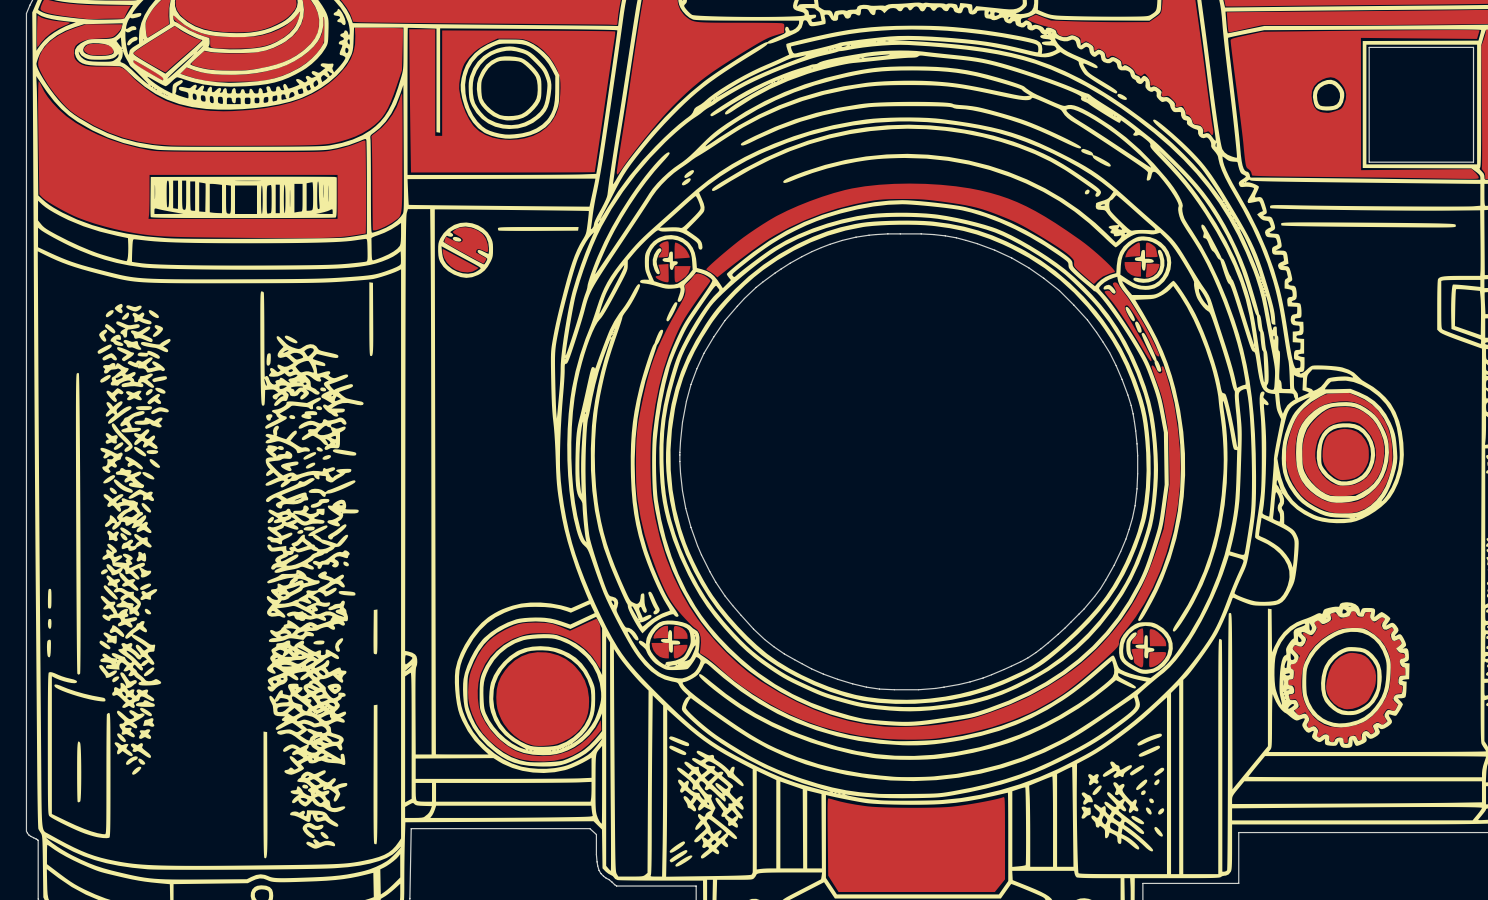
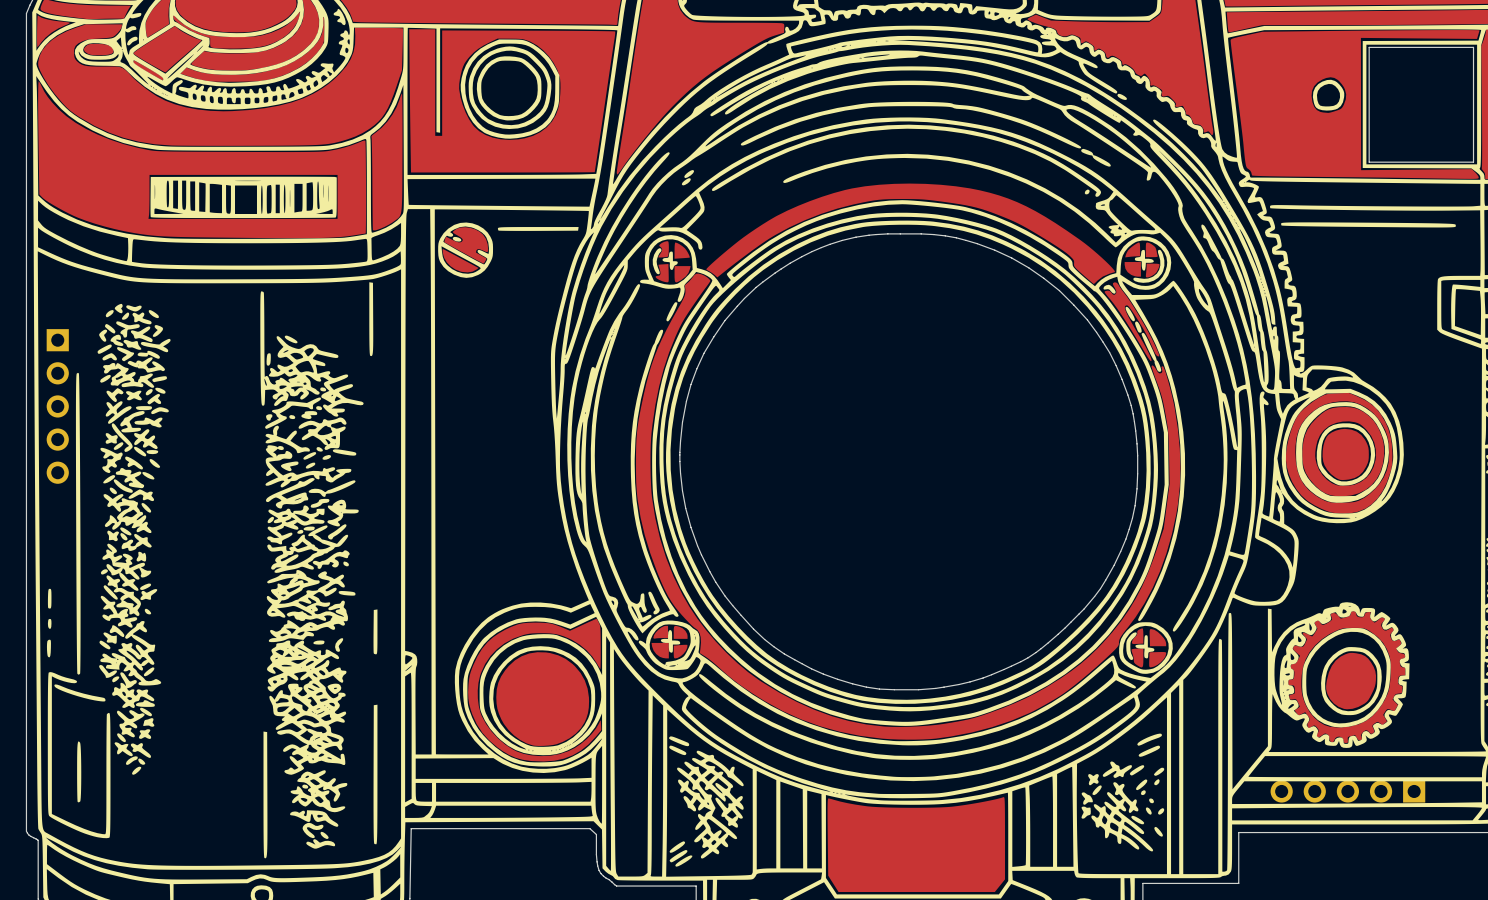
part: none -> (57, 406)
part: none -> (1347, 791)

